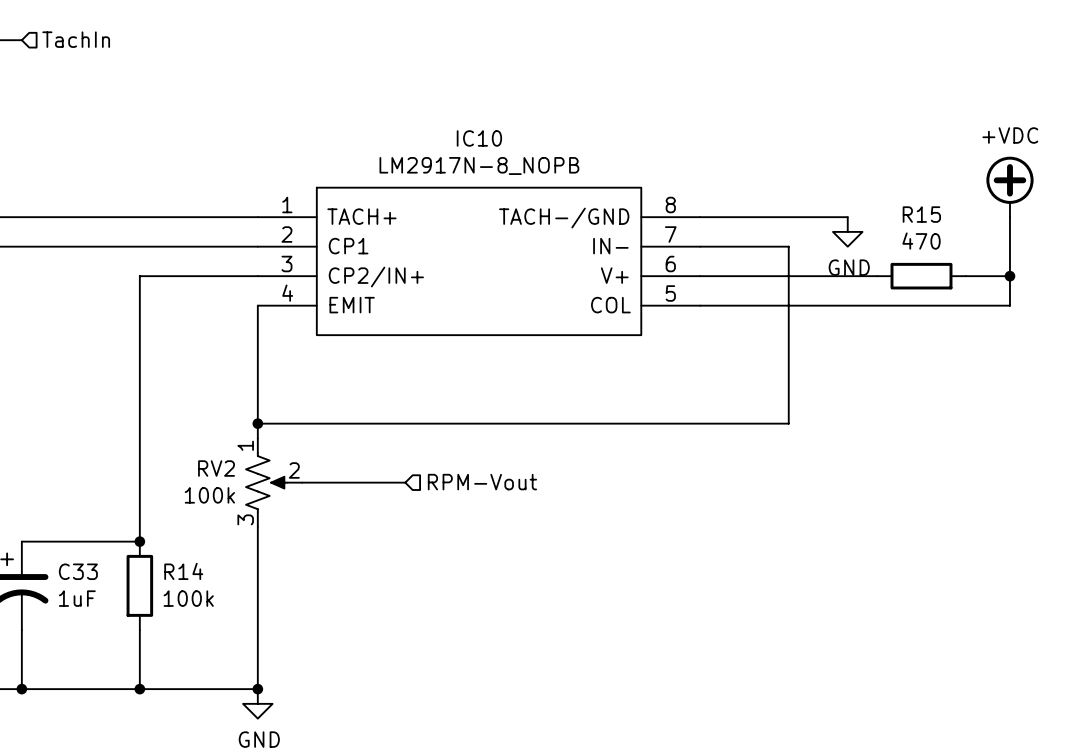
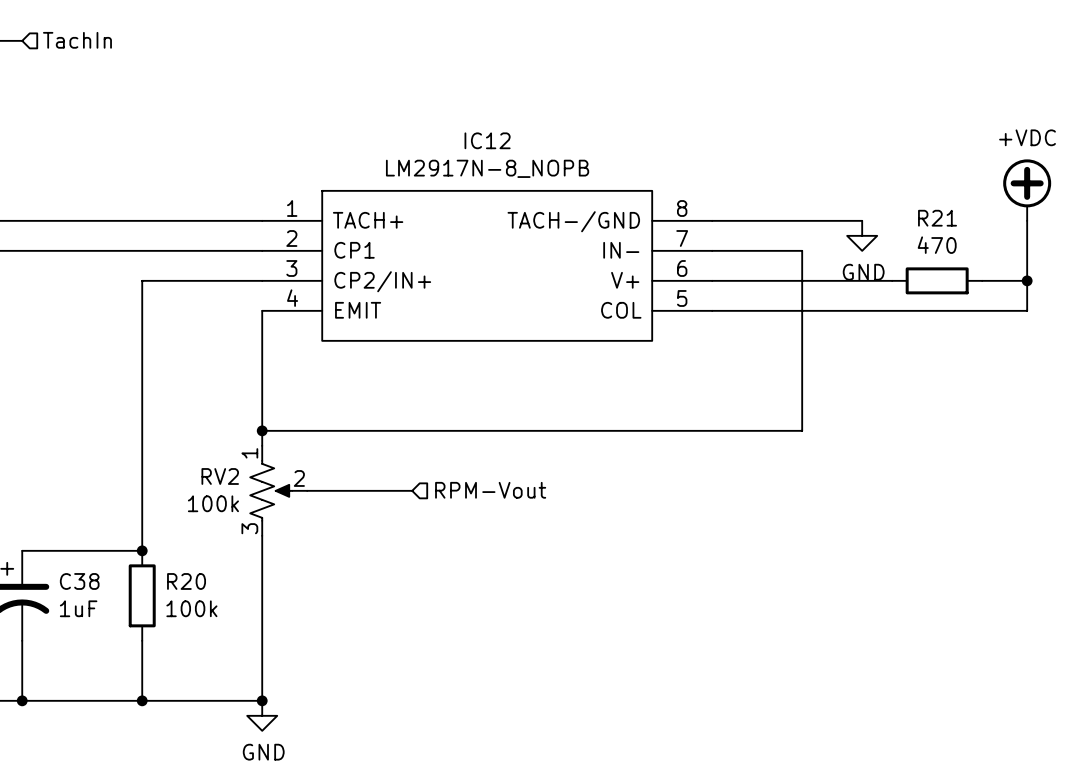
IC10 name: IC10 (479, 138) -> IC12 (487, 140)
R15 name: R15 (921, 214) -> R21 (937, 218)
C33 name: C33 (78, 571) -> C38 (79, 581)
R14 name: R14 (183, 571) -> R20 (186, 581)

